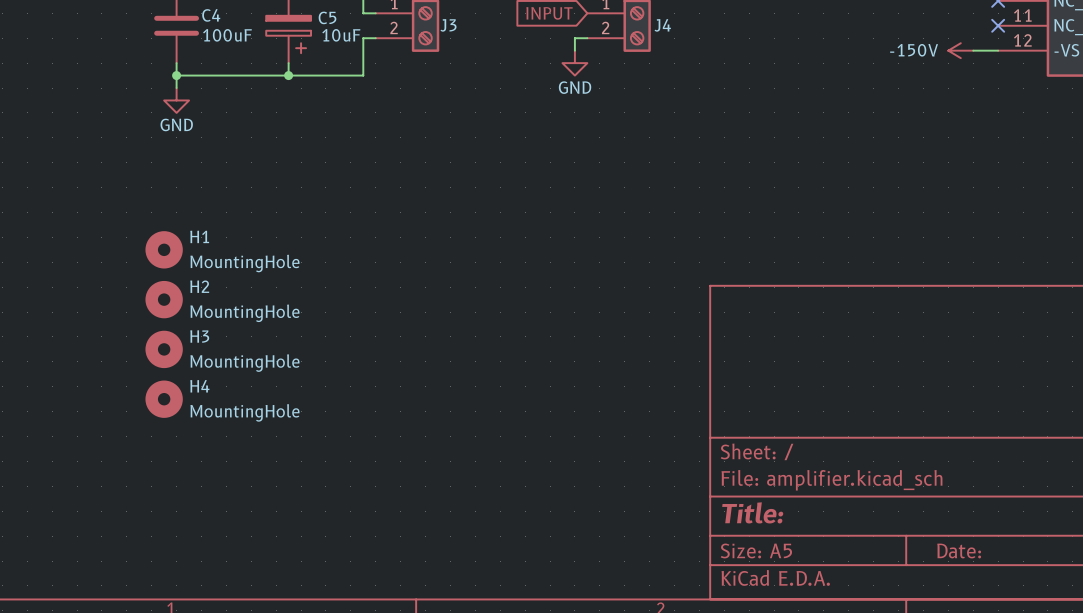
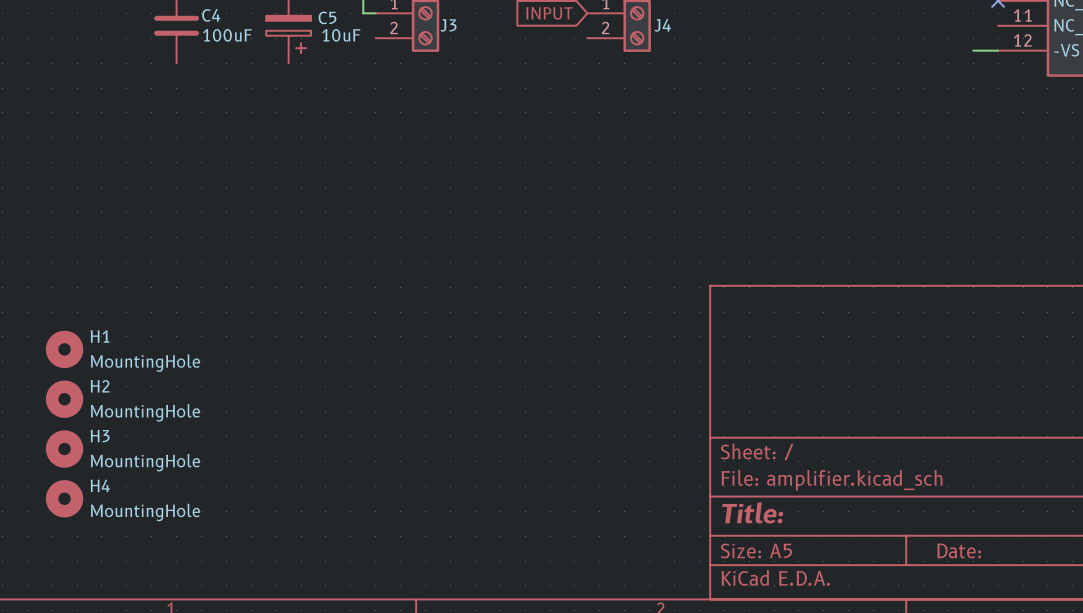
no-connect mark: (998, 25) -> none
wire: (375, 38) (363, 38) (363, 75) (176, 75) -> none
wire: (587, 38) (574, 38) (574, 50) -> none
power symbol: -150V (960, 50) -> none
wire: (176, 63) (176, 88) -> none
wire: (288, 63) (288, 75) -> none
power symbol: GND (574, 63) -> none
junction: (176, 75) -> none
junction: (288, 75) -> none
power symbol: GND (176, 100) -> none
H1 position: (164, 249) -> (64, 349)
H2 position: (164, 299) -> (64, 399)
H3 position: (164, 349) -> (64, 449)
H4 position: (164, 399) -> (64, 498)

